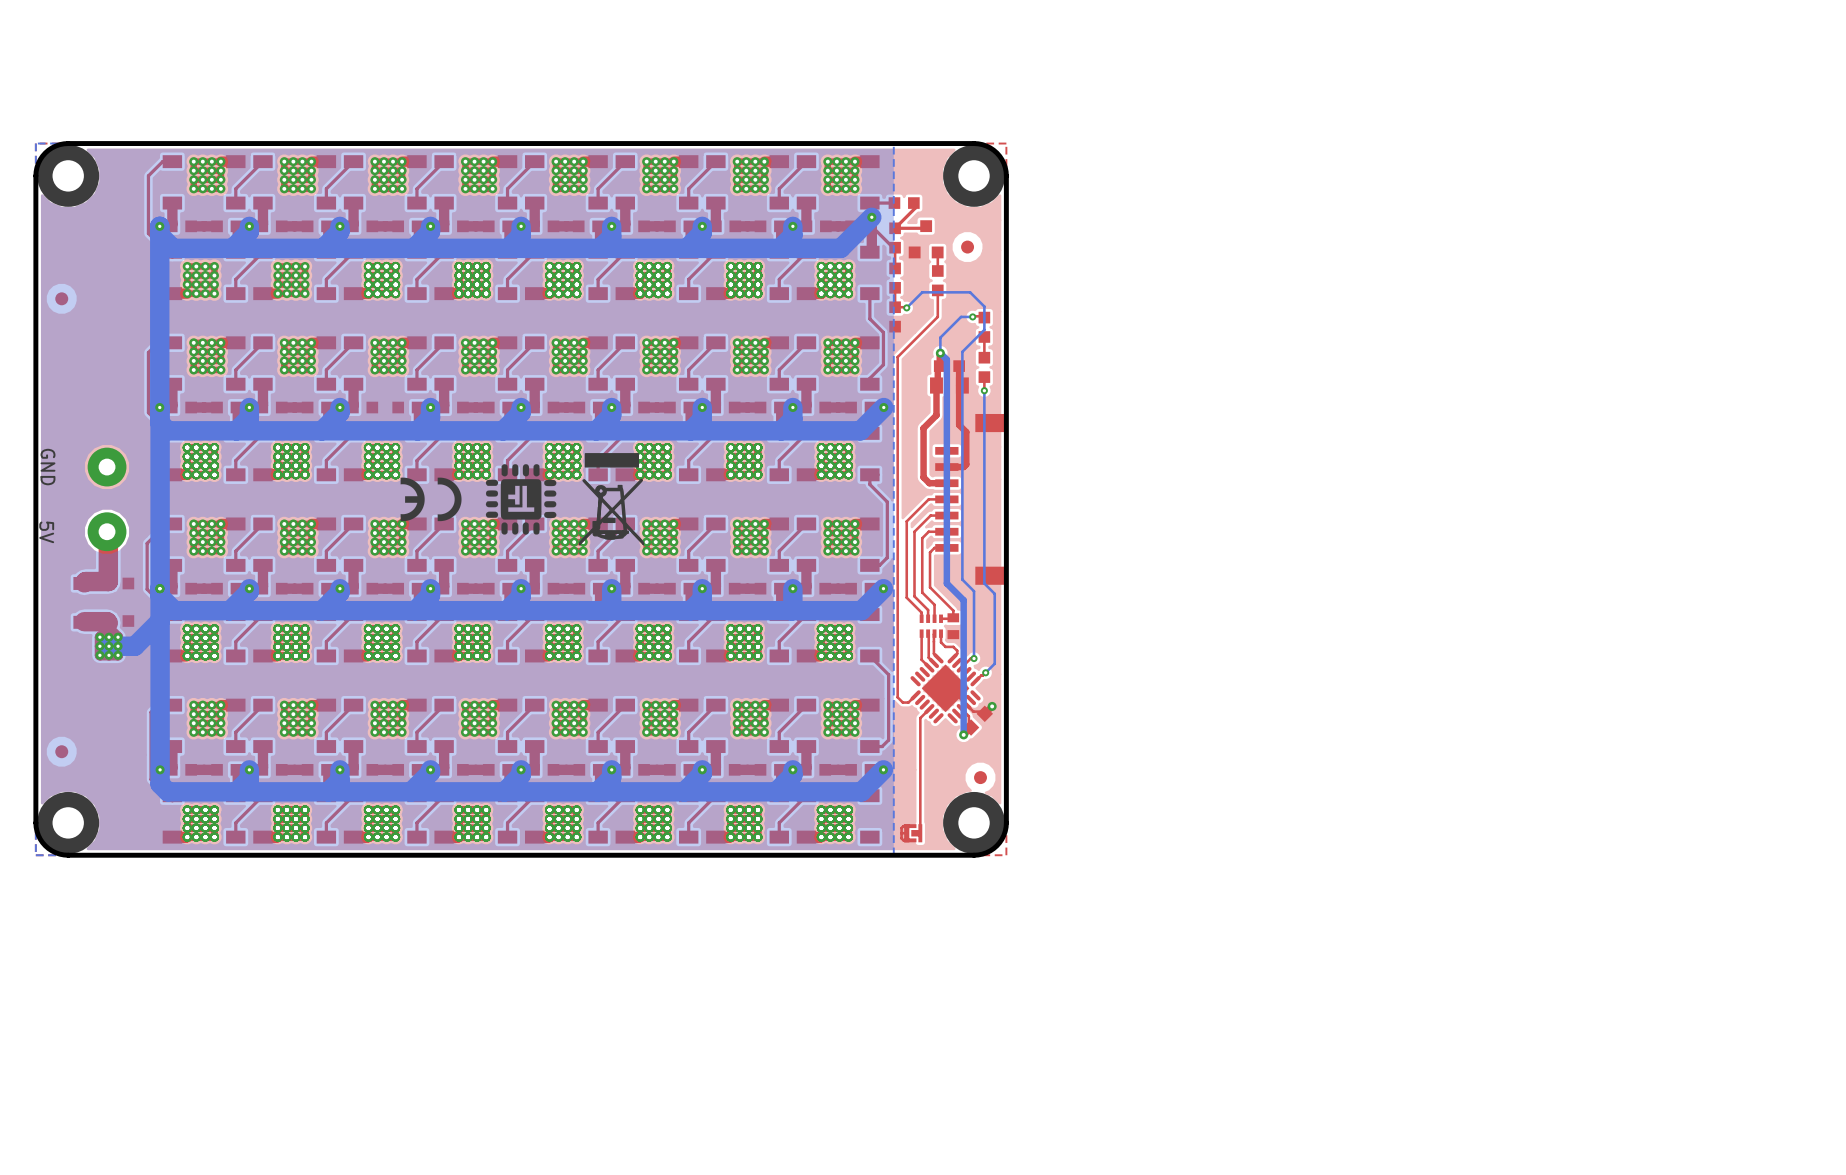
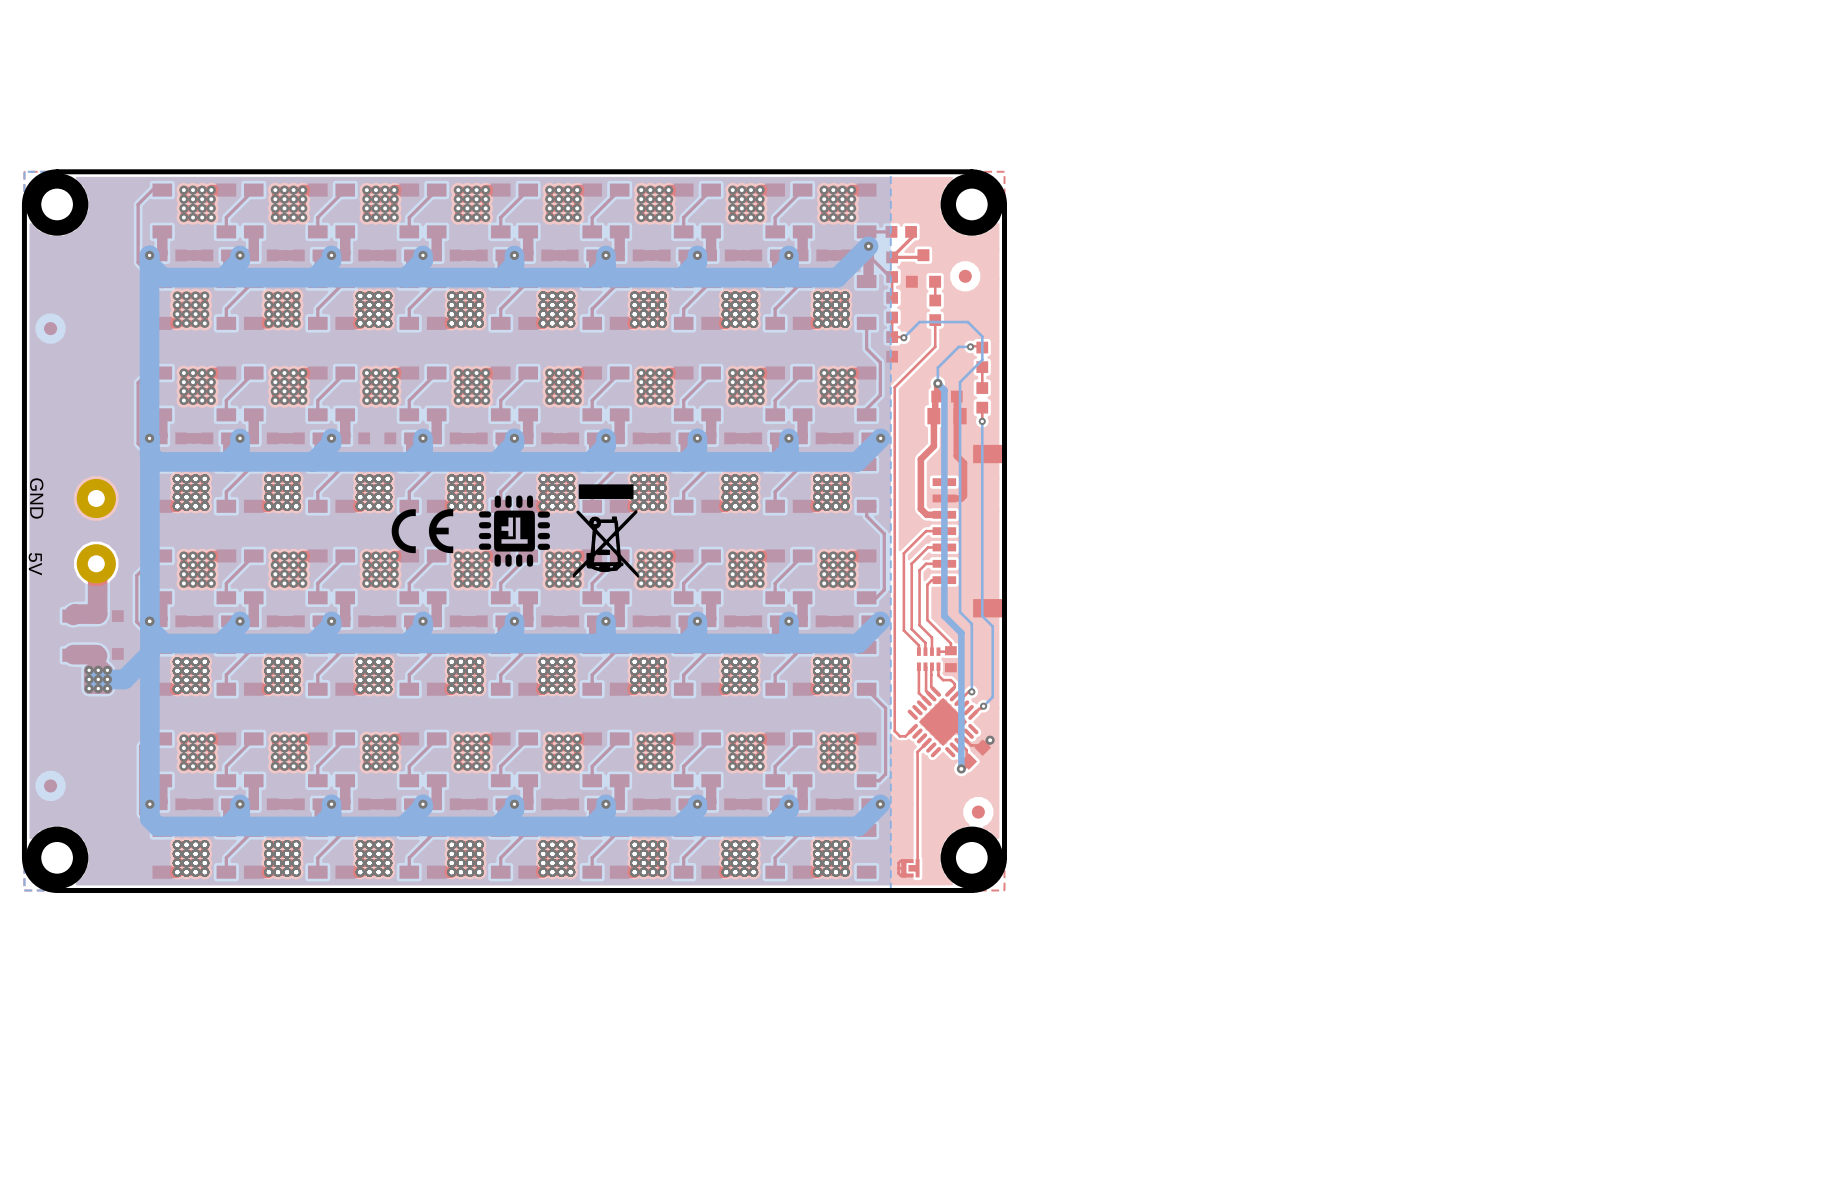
drawing shape: [400, 477, 462, 522] -> [391, 509, 454, 554]

